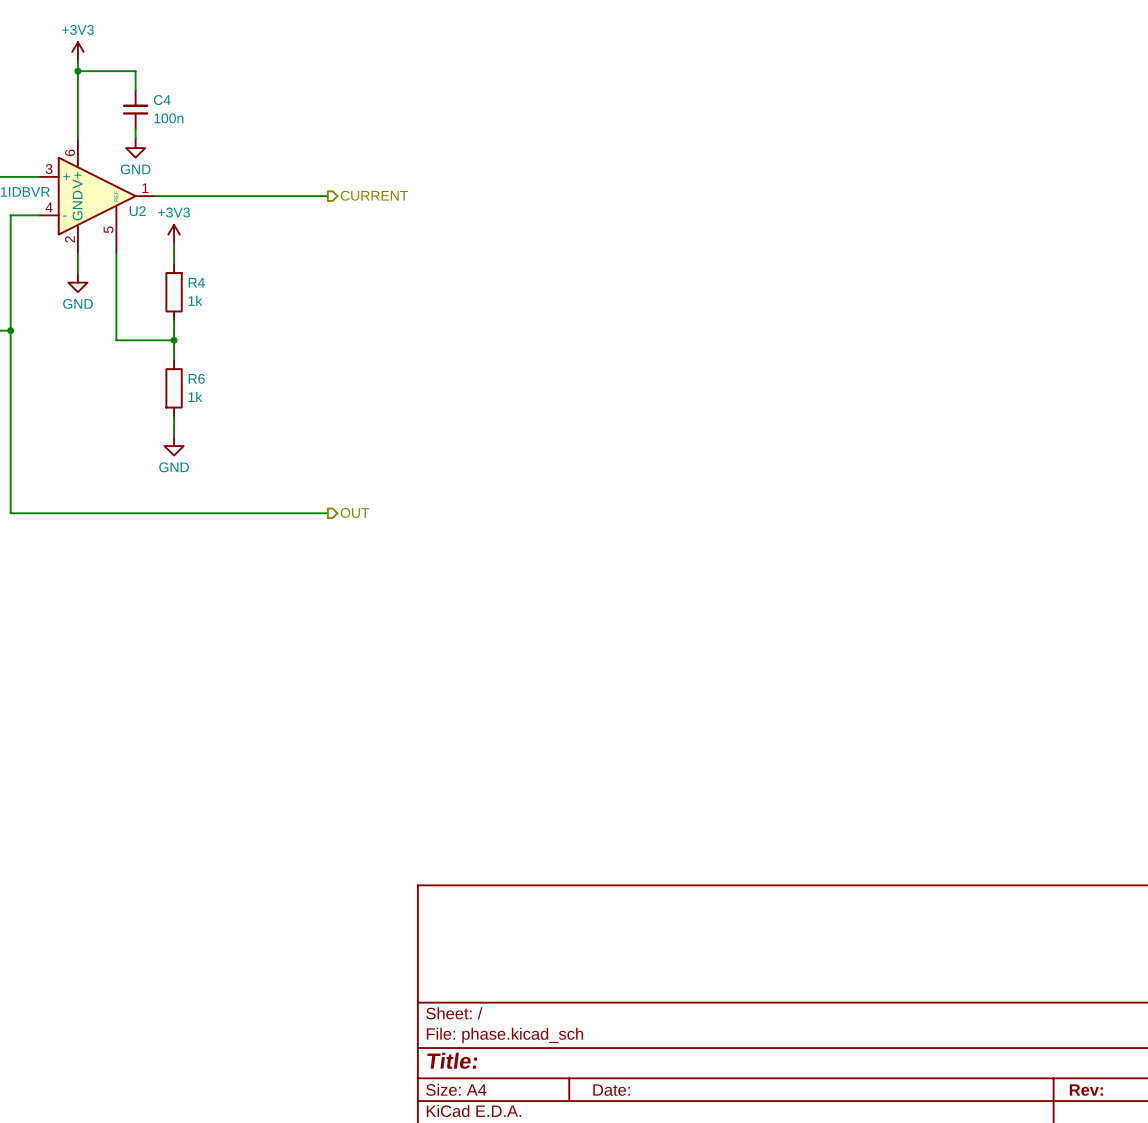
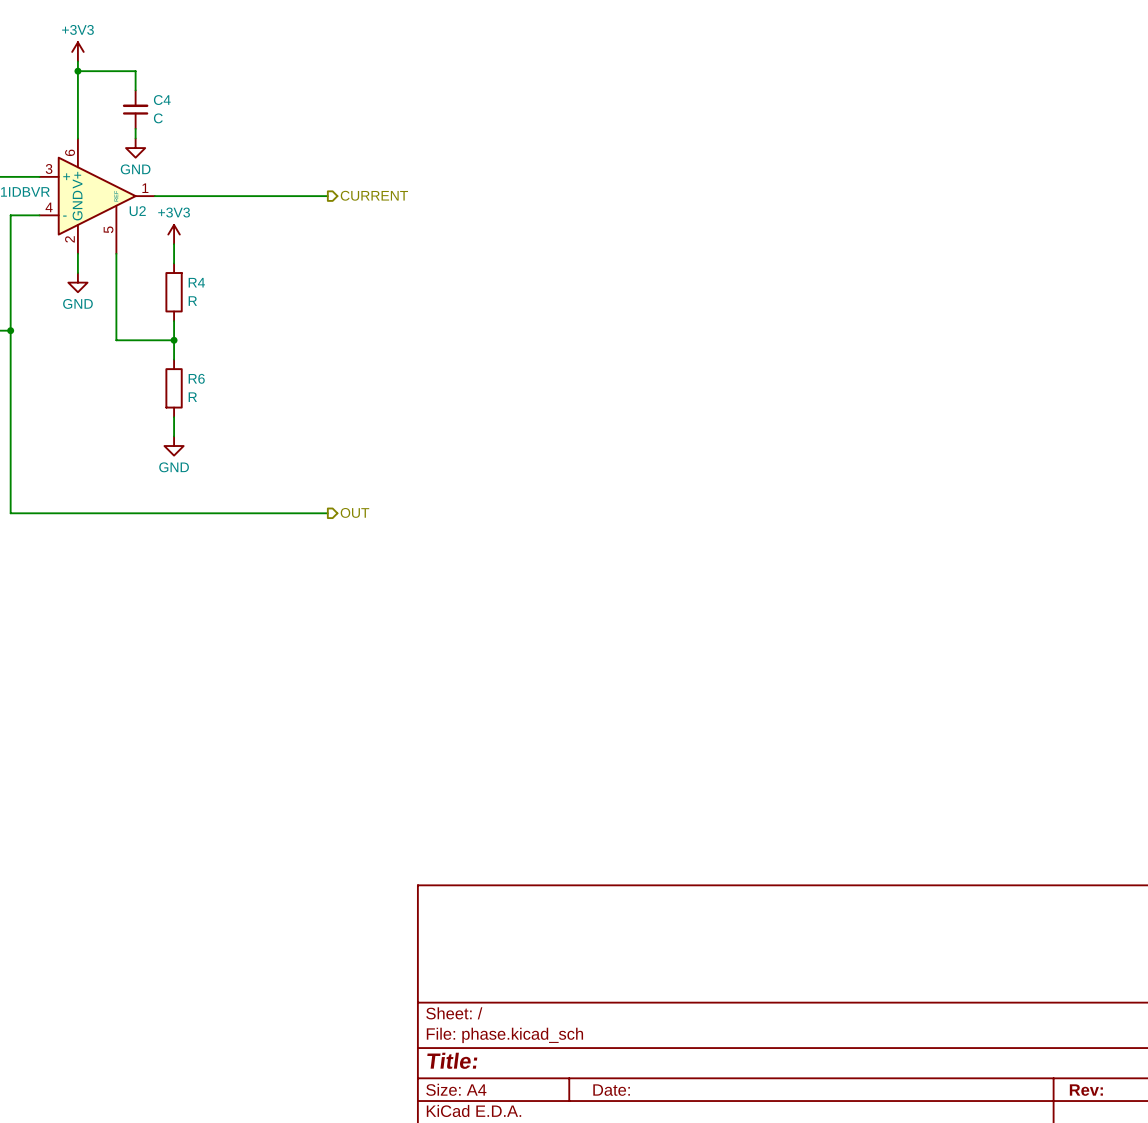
C4 value: 100n (168, 118) -> C (158, 118)
R4 value: 1k (195, 300) -> R (192, 301)
R6 value: 1k (195, 396) -> R (192, 397)

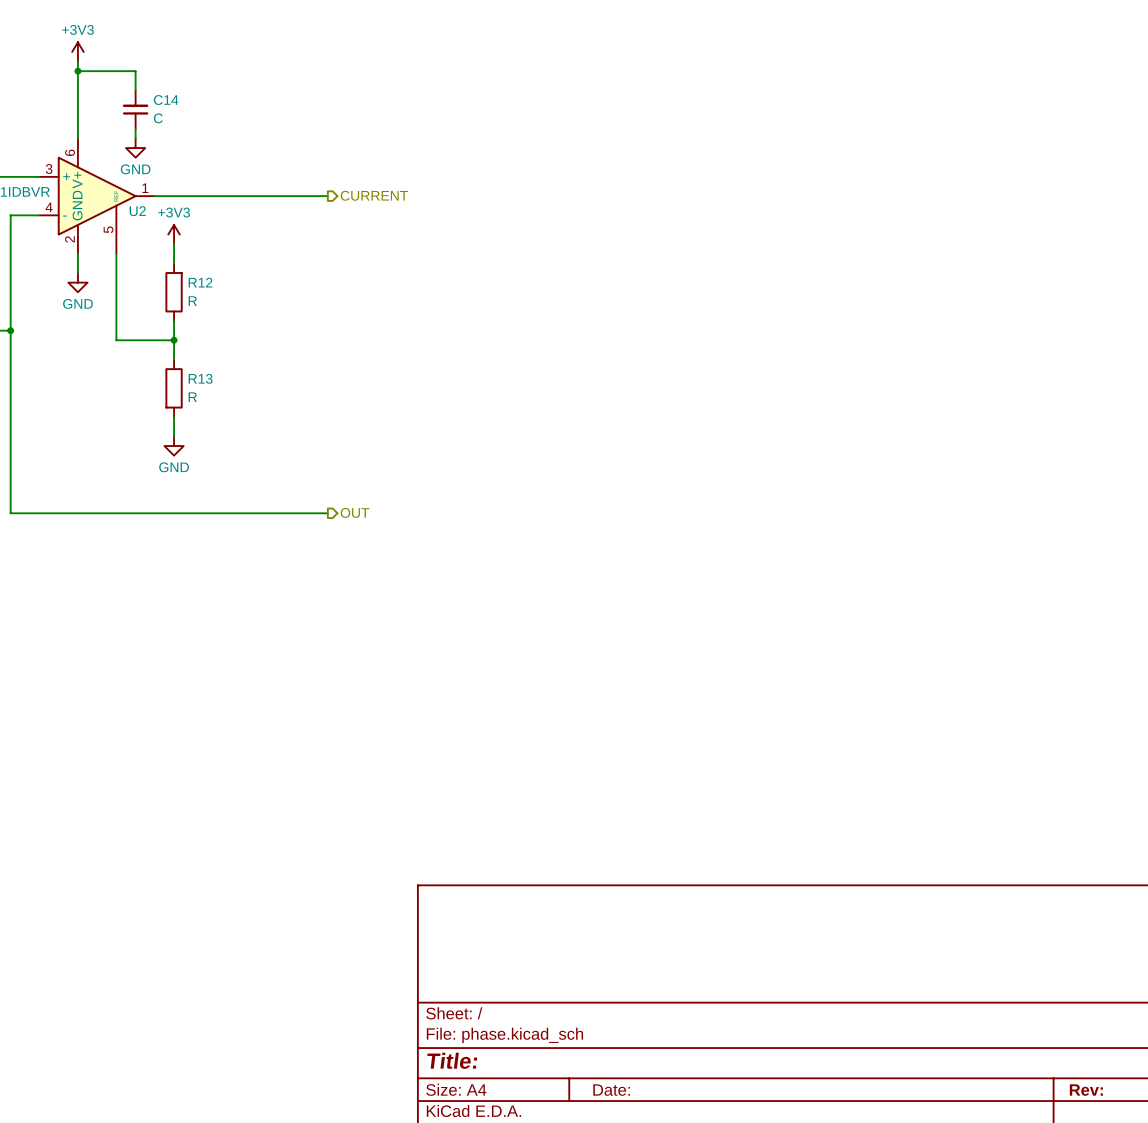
C4 name: C4 (162, 100) -> C14 (166, 100)
R4 name: R4 (196, 282) -> R12 (200, 282)
R6 name: R6 (196, 378) -> R13 (200, 378)

